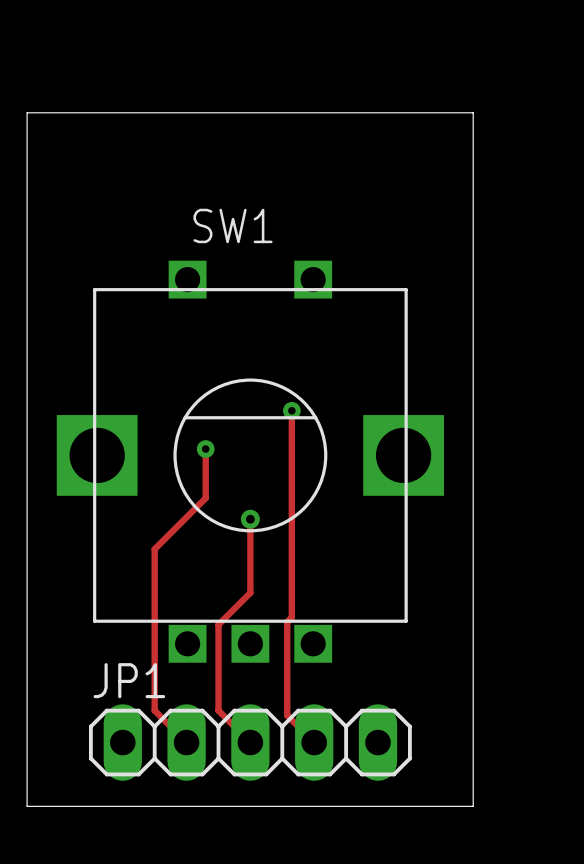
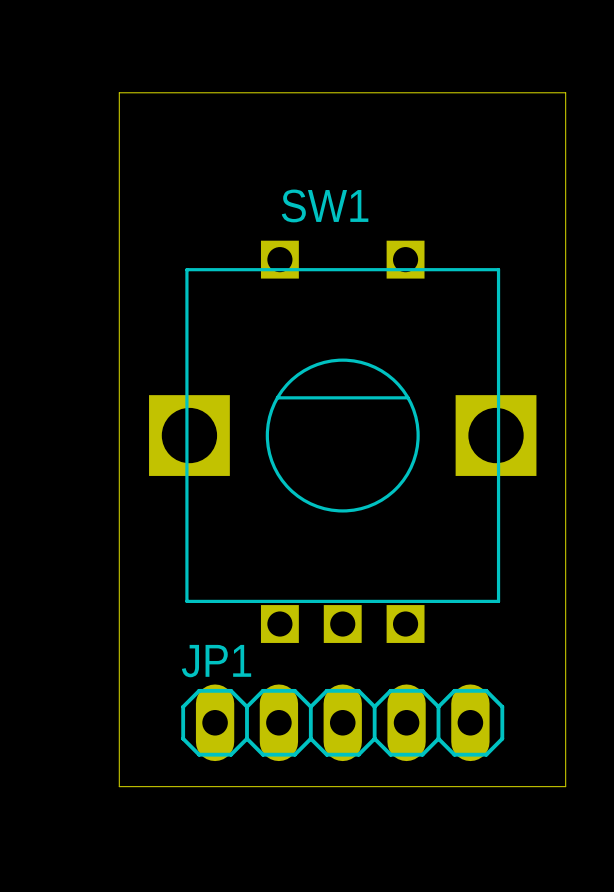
track: (291, 410) (291, 617) (287, 621) (287, 715) (314, 742) -> none
via: (291, 410) -> none
track: (205, 449) (205, 498) (154, 549) (154, 710) (186, 742) -> none
via: (205, 449) -> none
track: (250, 519) (250, 592) (218, 624) (218, 710) (250, 742) -> none
via: (250, 519) -> none

